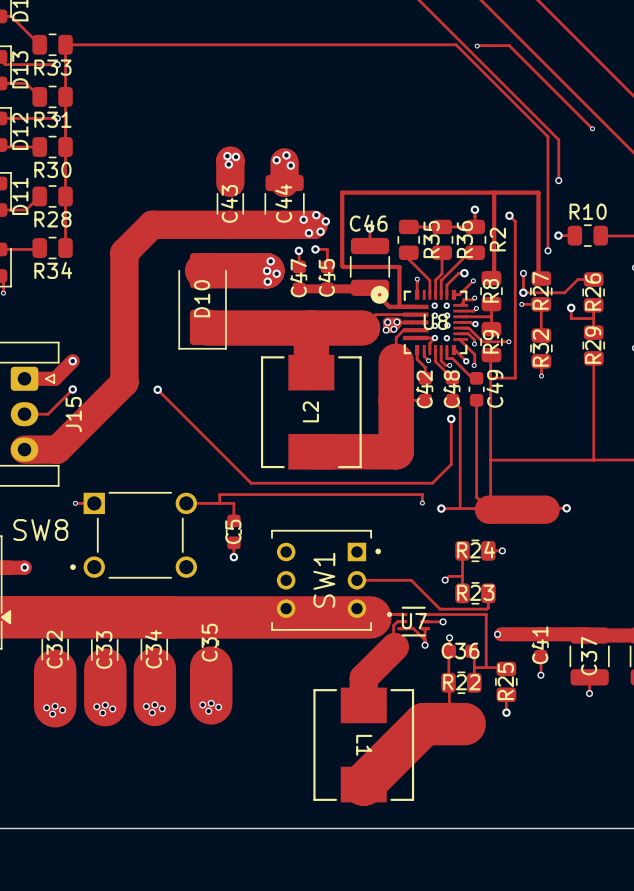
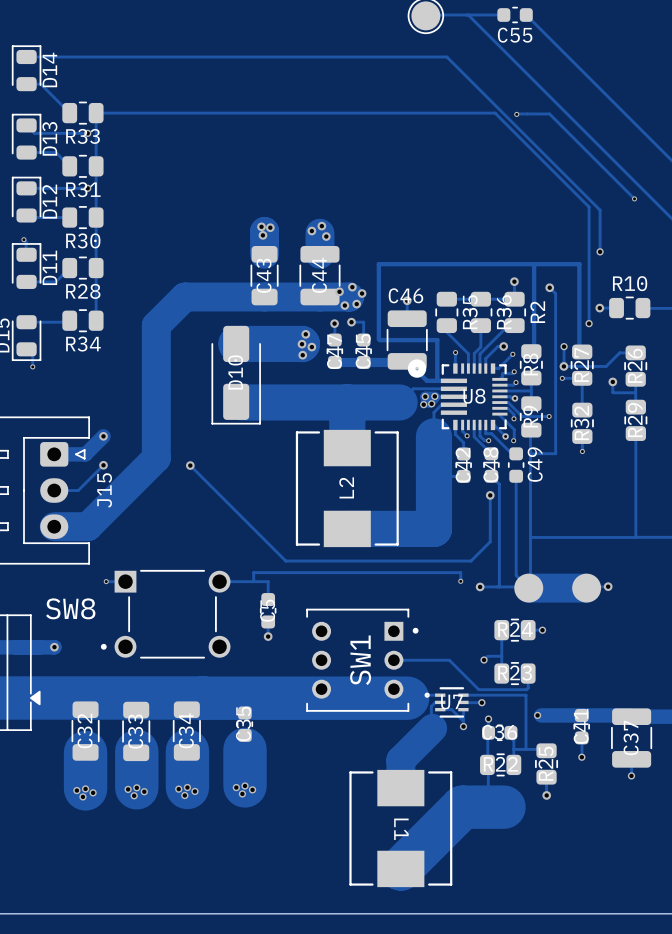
via: (434, 305) -> none
via: (446, 305) -> none
via: (434, 315) -> none
via: (447, 315) -> none
via: (434, 325) -> none
via: (447, 325) -> none
track: (415, 338) (434, 338) (429, 343) (429, 350) -> none
via: (434, 338) -> none
via: (446, 338) -> none

